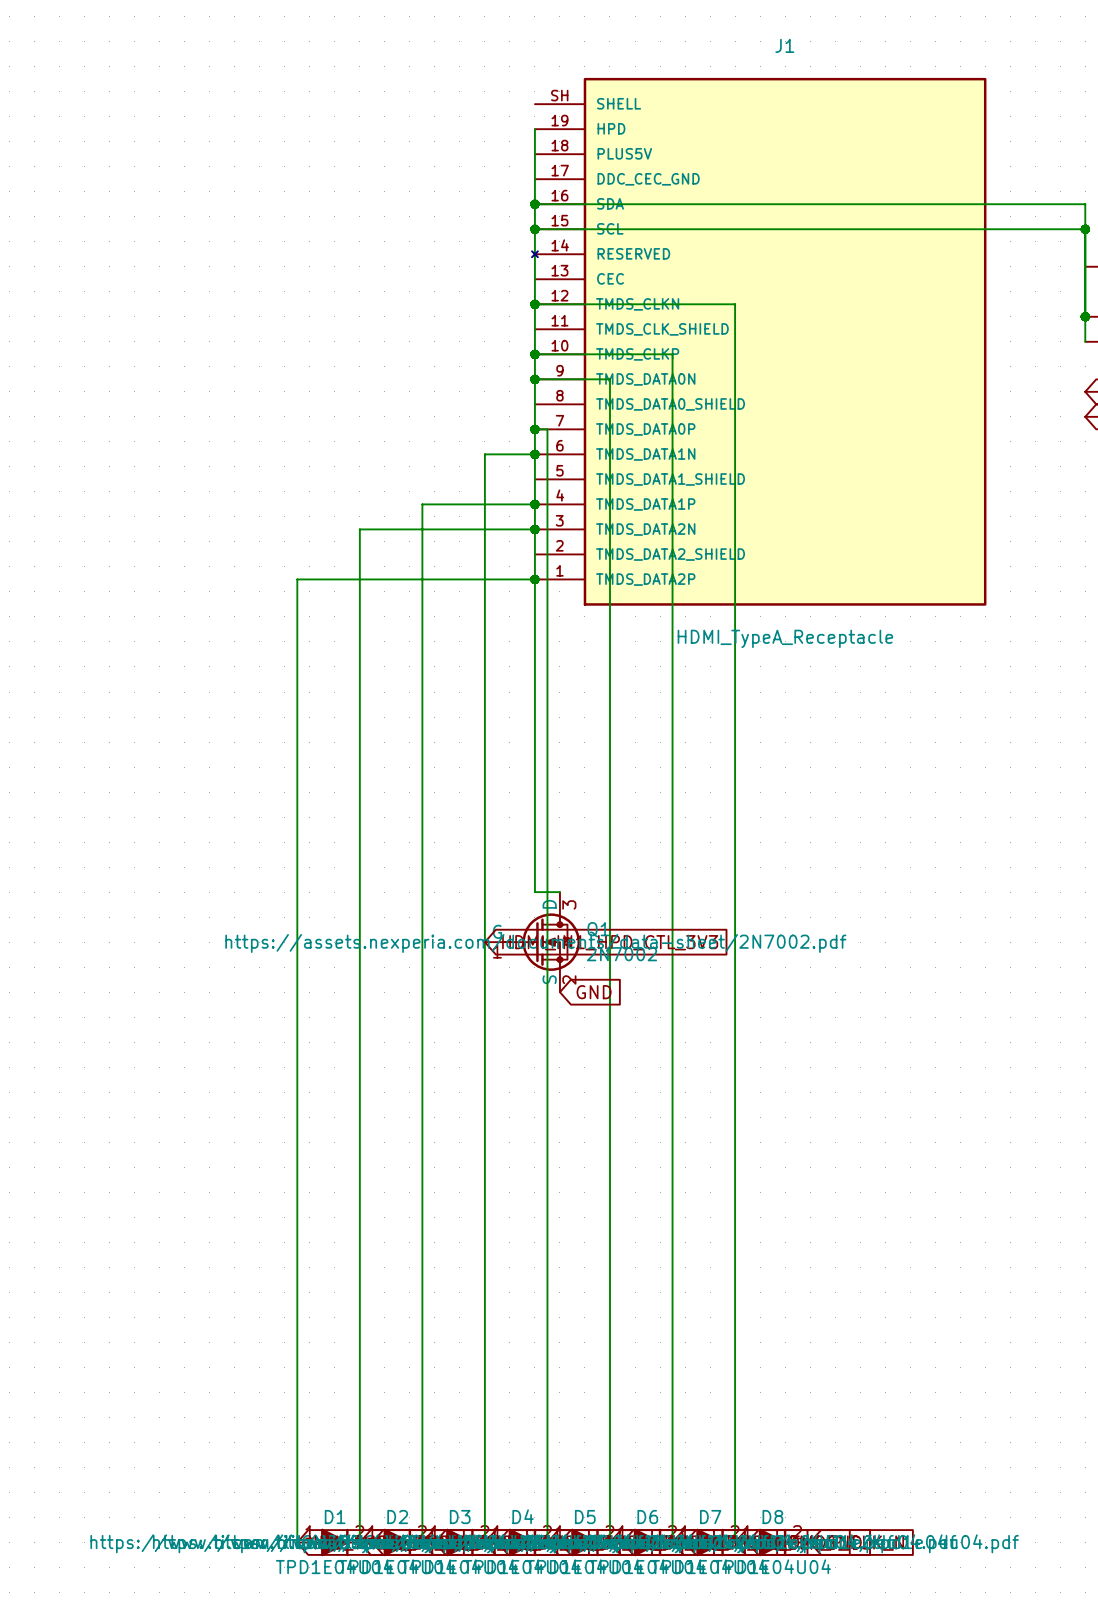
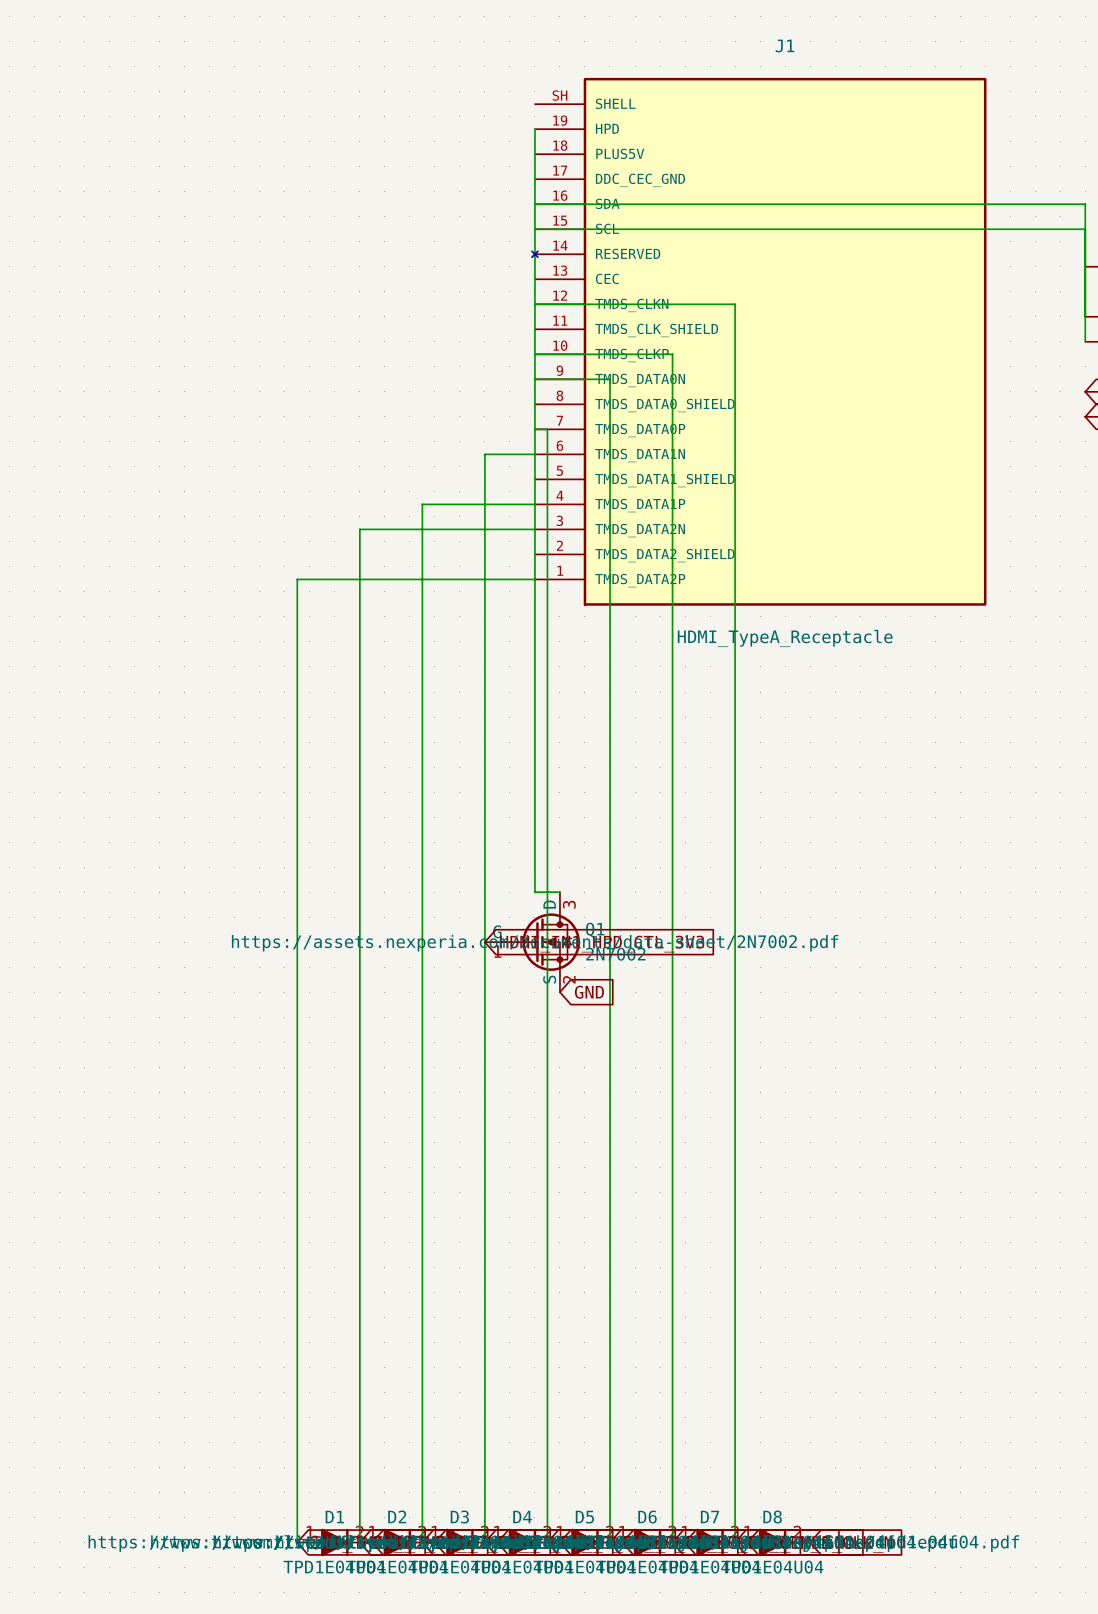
junction: (534, 204) -> none
junction: (534, 229) -> none
junction: (1085, 229) -> none
junction: (534, 304) -> none
junction: (1085, 316) -> none
junction: (534, 354) -> none
junction: (534, 379) -> none
junction: (534, 429) -> none
junction: (534, 454) -> none
junction: (534, 504) -> none
junction: (534, 529) -> none
junction: (534, 579) -> none

